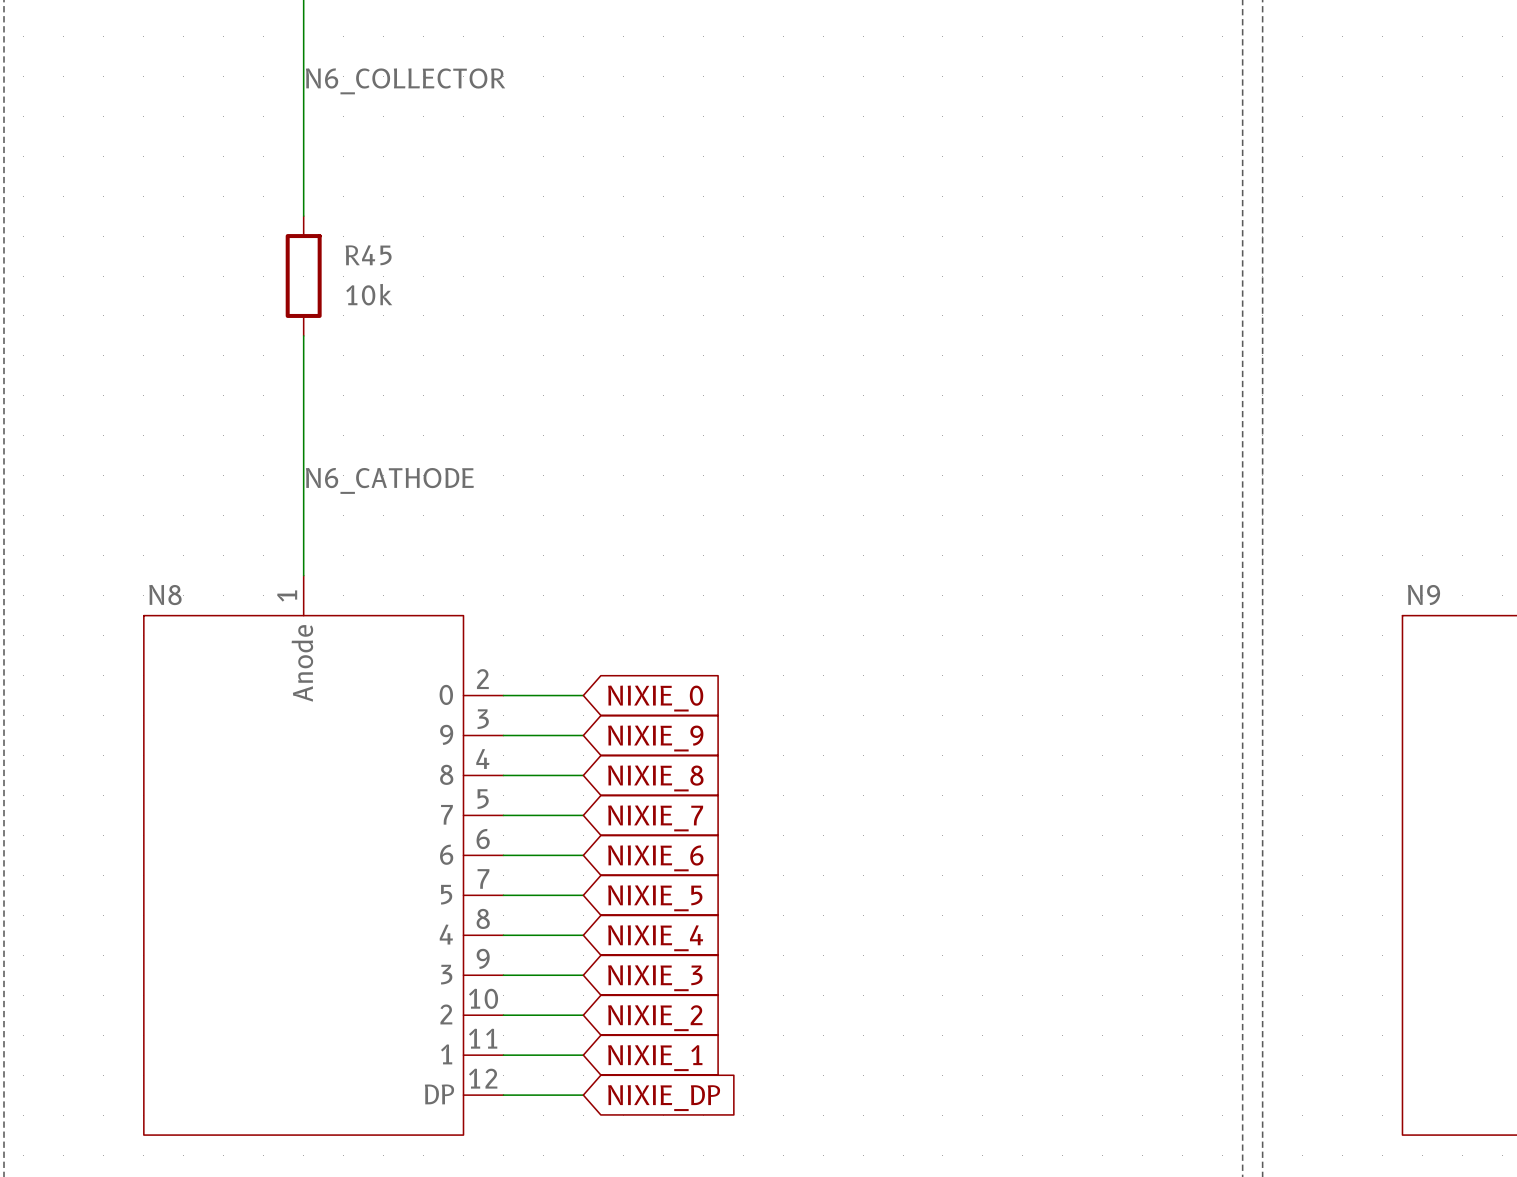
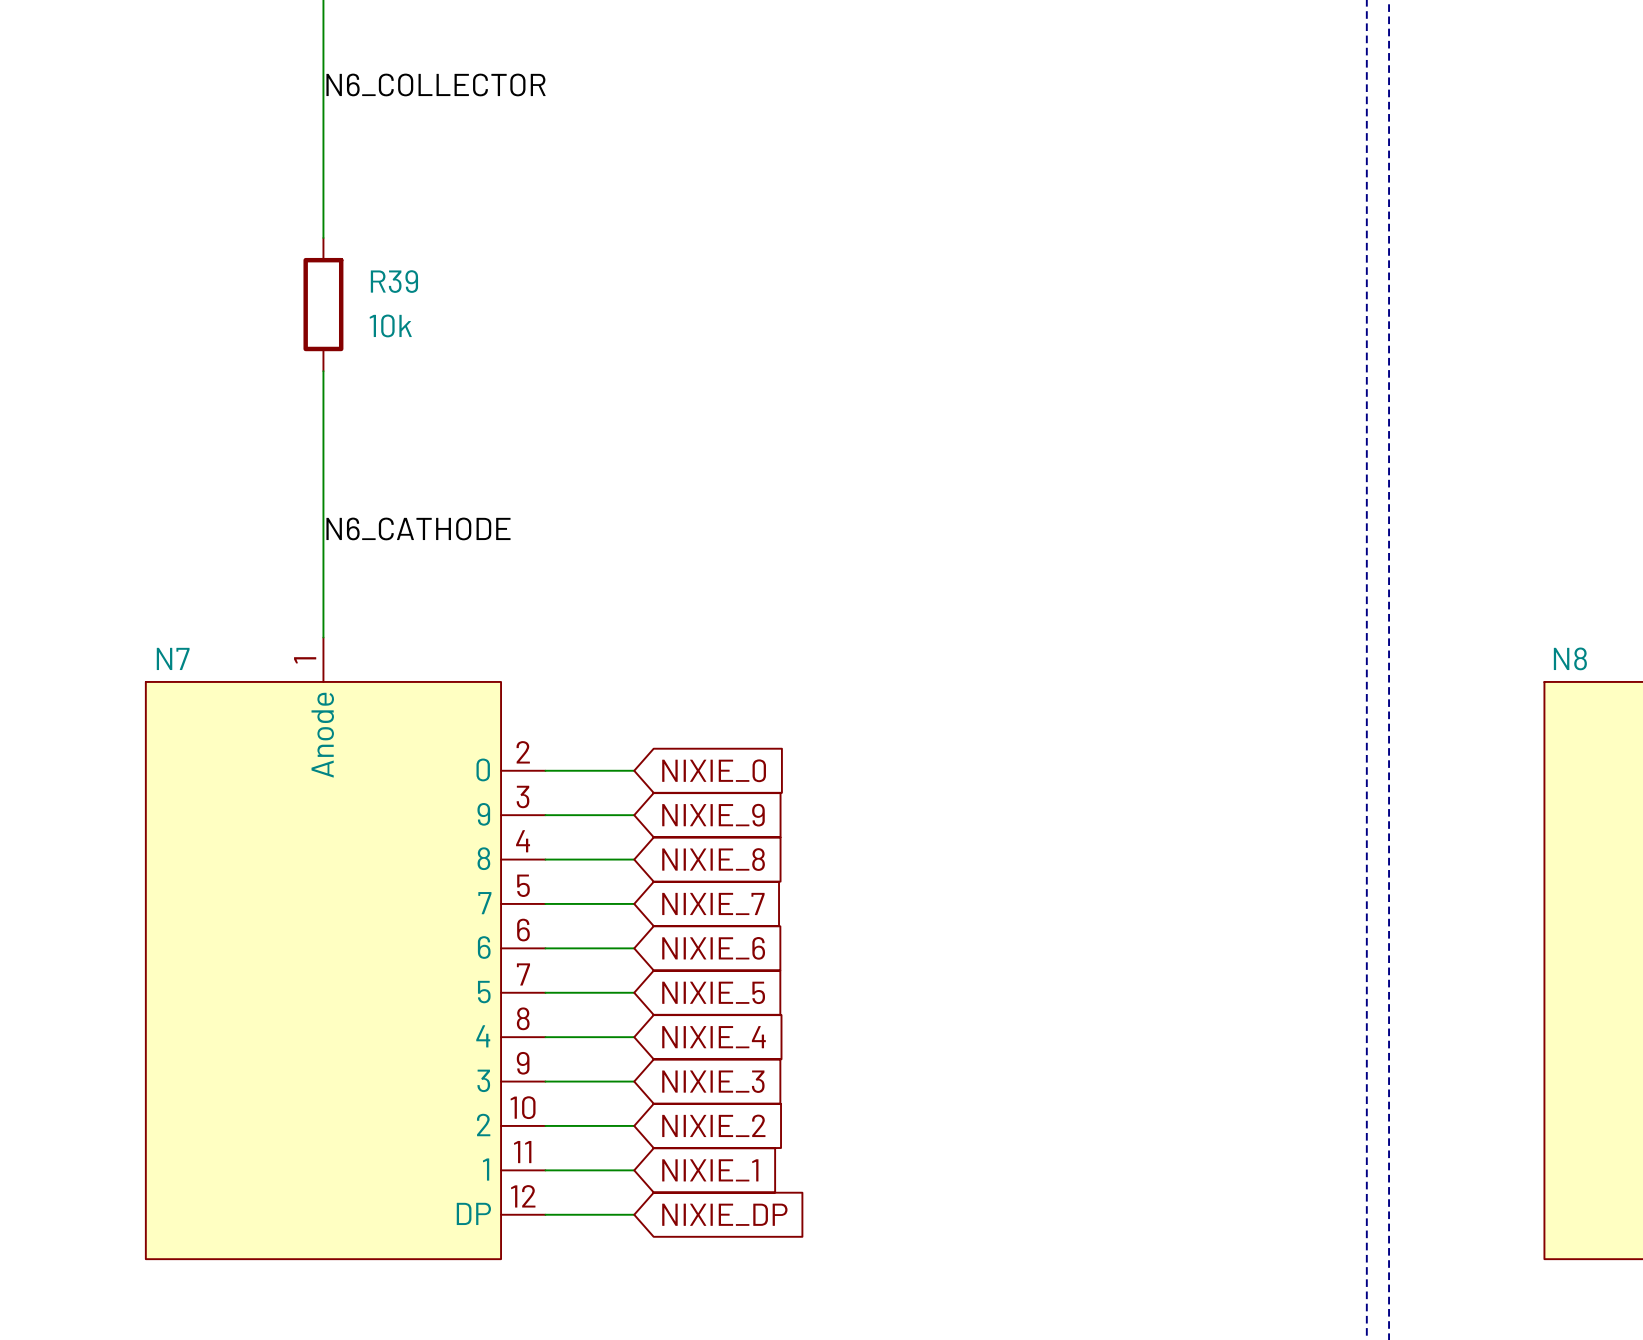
R45 name: R45 (368, 255) -> R39 (394, 281)
N8 name: N8 (165, 595) -> N7 (173, 658)
N9 name: N9 (1423, 595) -> N8 (1570, 658)

